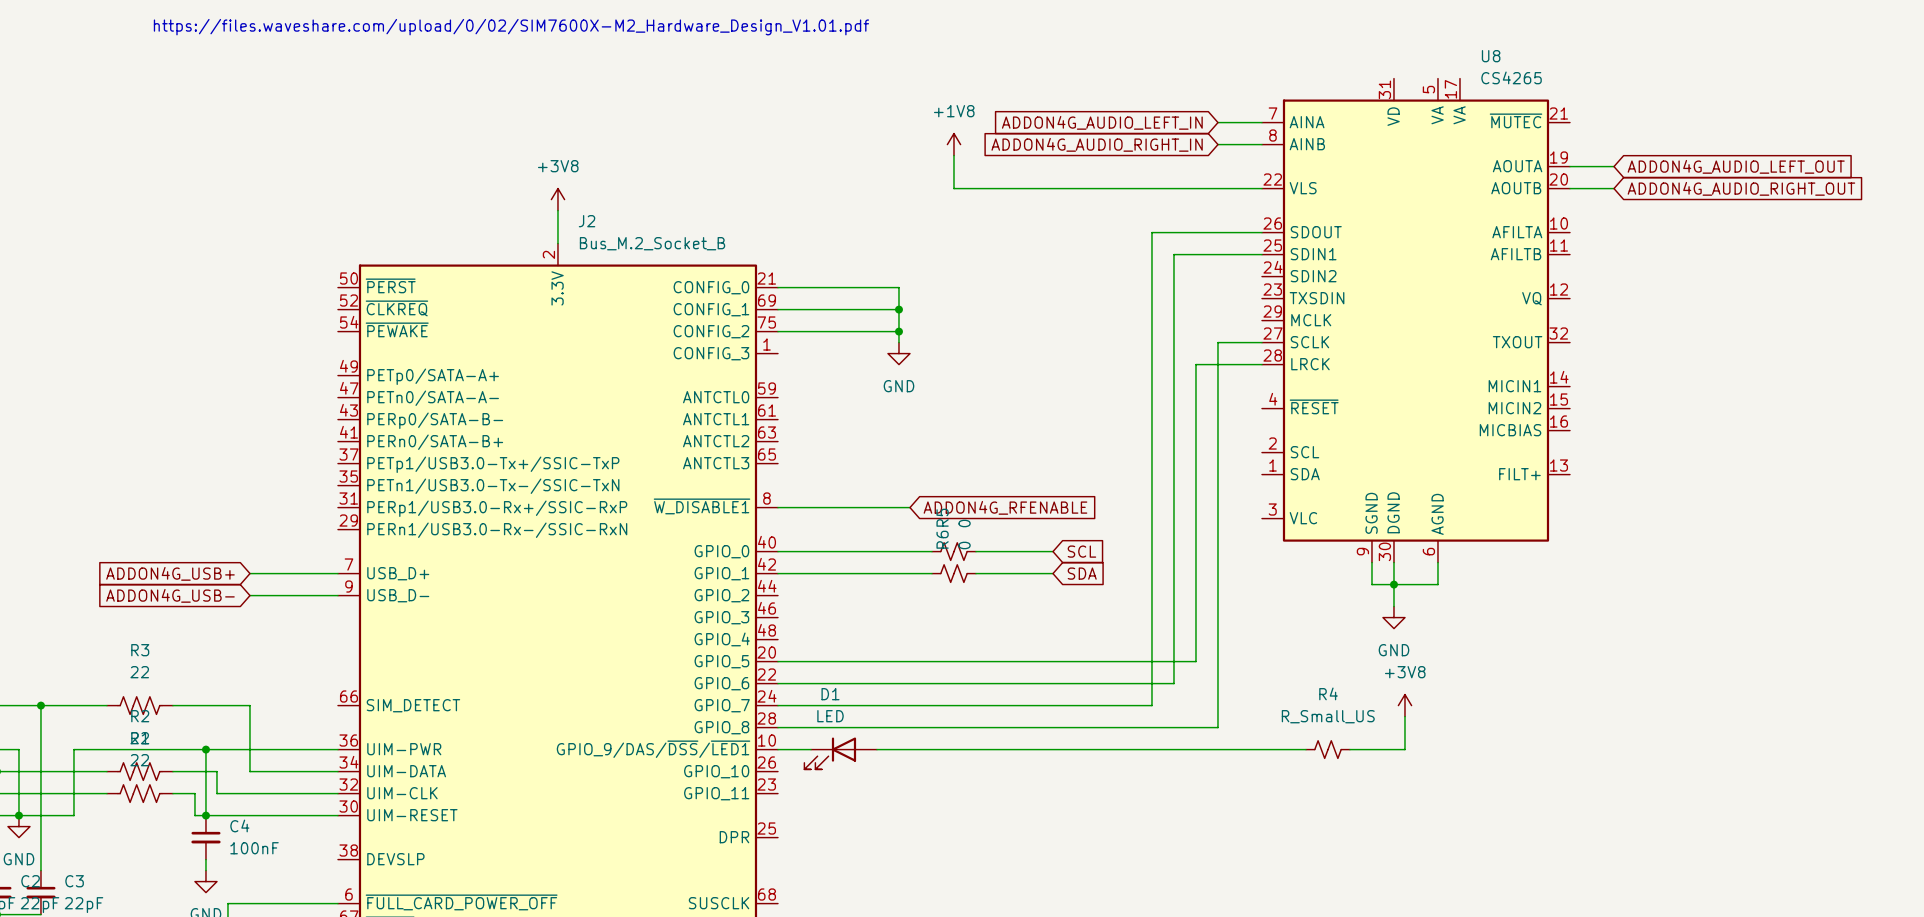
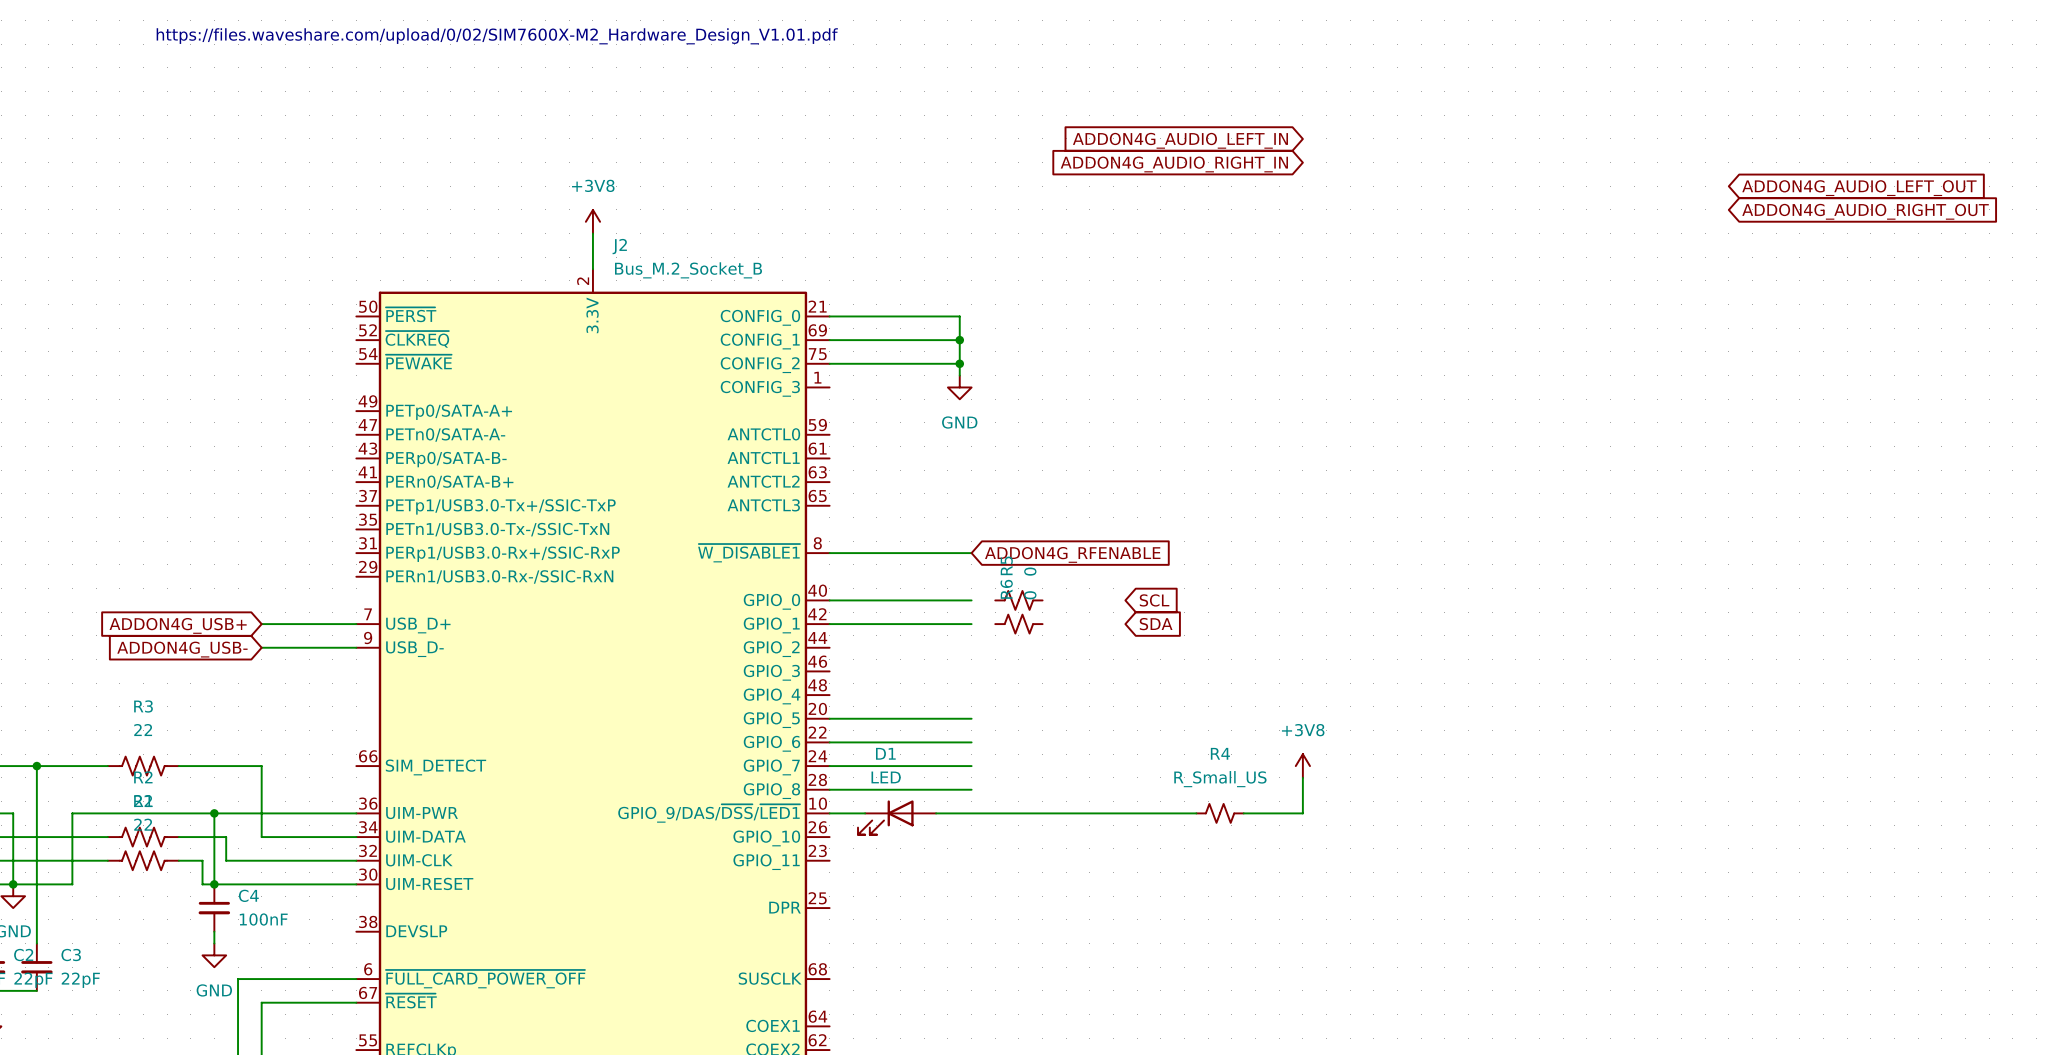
wire: (1217, 122) (1261, 122) -> none
power symbol: +1V8 (953, 144) -> none
wire: (1217, 144) (1261, 144) -> none
wire: (953, 155) (953, 188) (1261, 188) -> none
wire: (1569, 166) (1613, 166) -> none
wire: (1569, 188) (1613, 188) -> none
wire: (1261, 232) (1151, 232) (1151, 705) (909, 705) -> none
wire: (1261, 254) (1173, 254) (1173, 683) (909, 683) -> none
U8: CS4265 (1415, 320) -> none
wire: (1261, 342) (1217, 342) (1217, 716) -> none
wire: (1261, 364) (1195, 364) (1195, 661) (909, 661) -> none
wire: (909, 551) (931, 551) -> none
wire: (975, 551) (1052, 551) -> none
wire: (1371, 562) (1371, 584) (1437, 584) (1437, 562) -> none
wire: (1393, 562) (1393, 606) -> none
wire: (909, 573) (931, 573) -> none
wire: (975, 573) (1052, 573) -> none
junction: (1393, 584) -> none
power symbol: GND (1393, 617) -> none
power symbol position: +3V8 (1404, 705) -> +3V8 (1302, 766)
wire: (1404, 716) (1404, 749) (1349, 749) -> none
wire: (909, 727) (1217, 727) -> none
wire: (1217, 749) (1305, 749) -> (1302, 813) (1302, 789)
R4 position: (1327, 749) -> (1220, 813)

